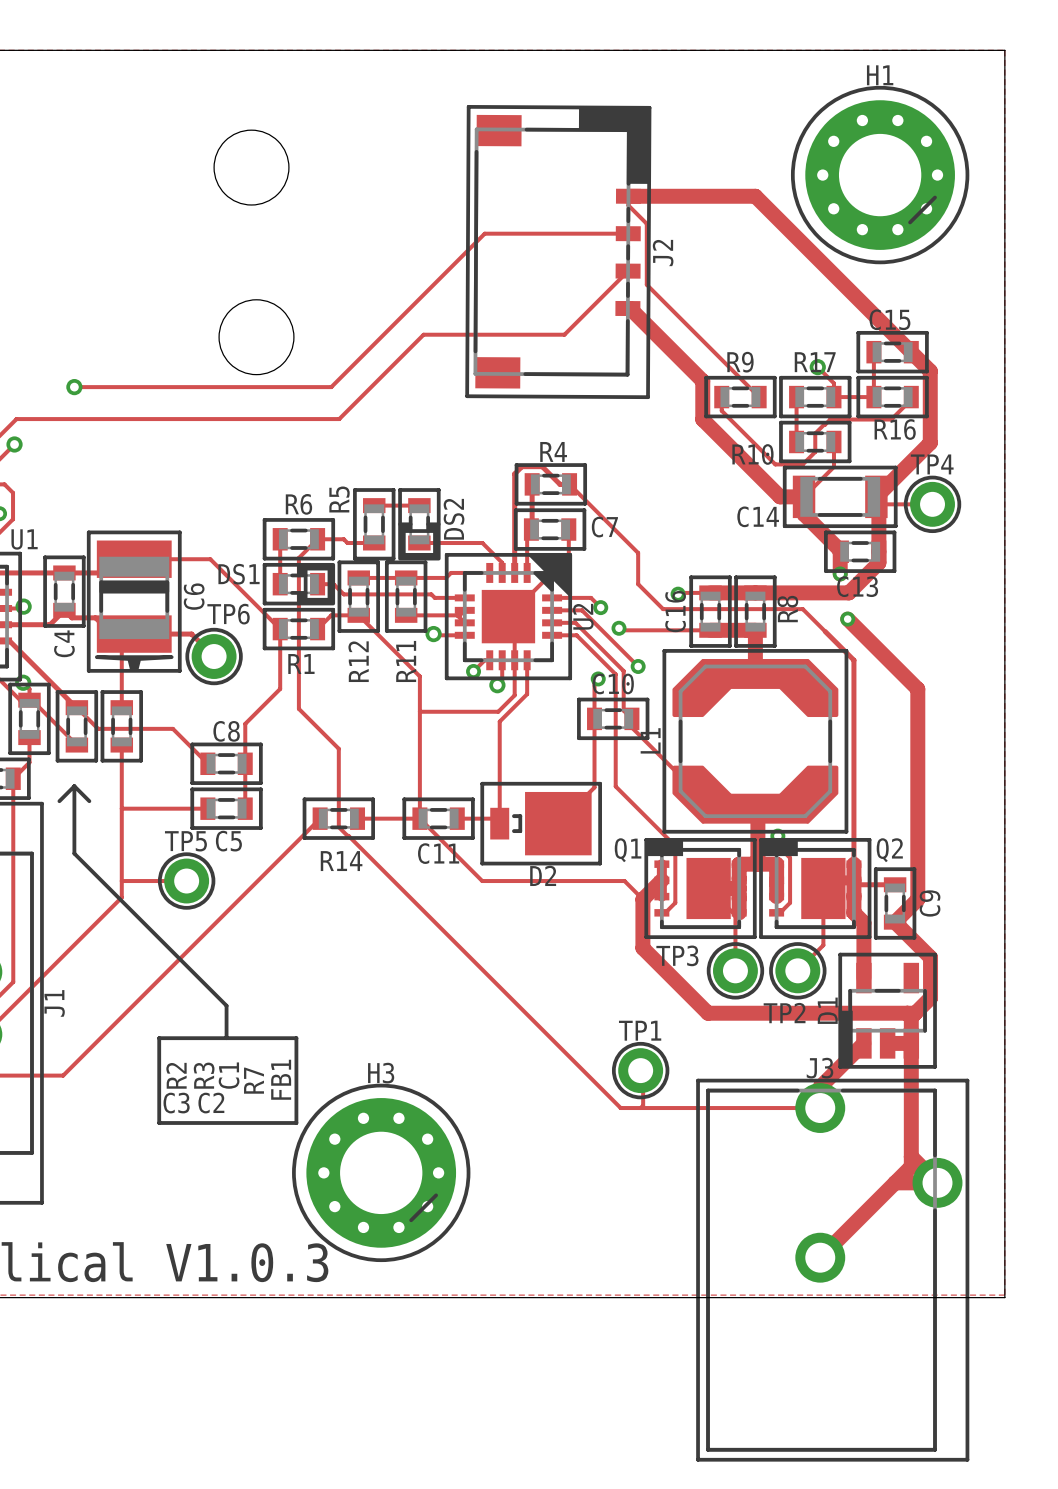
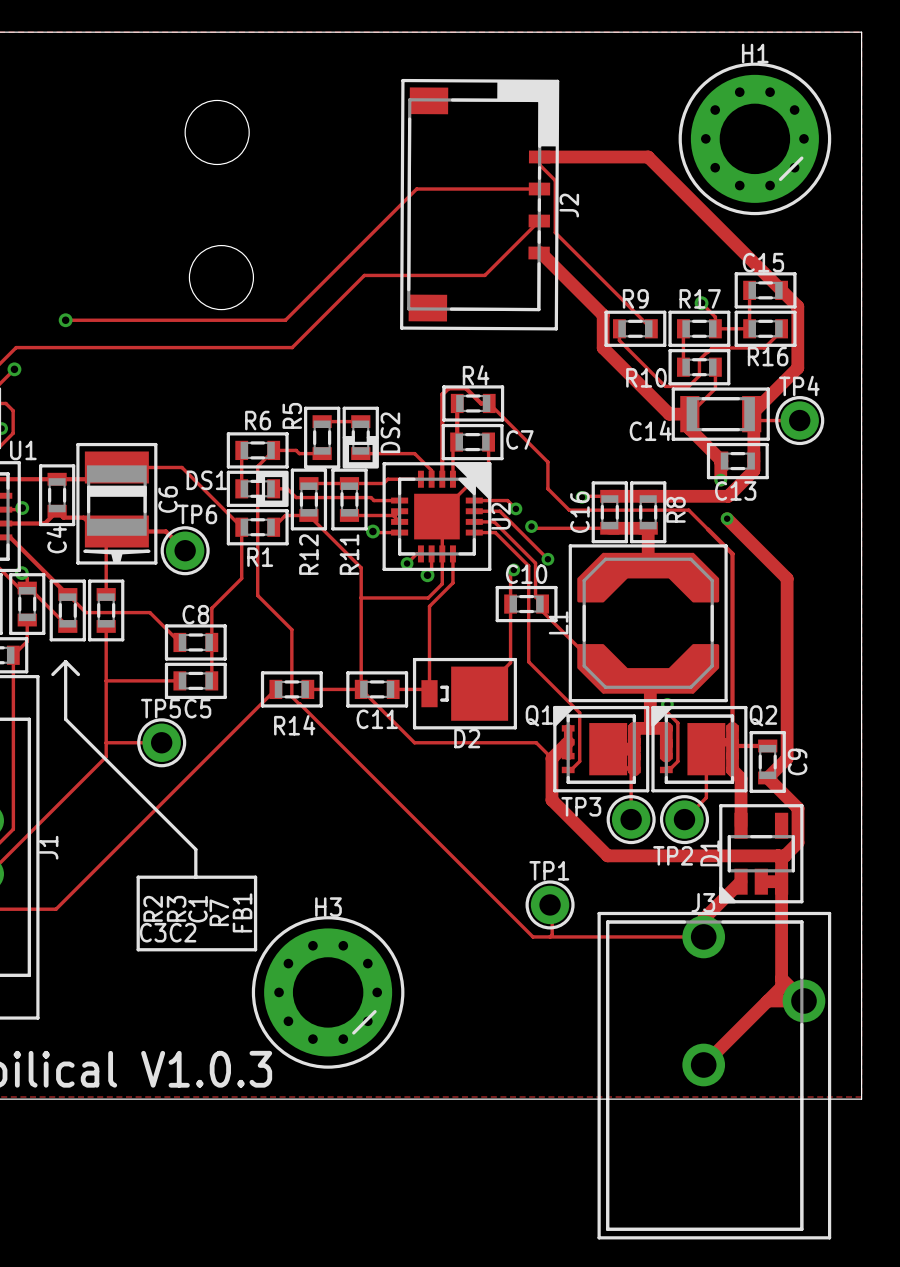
Q1 footprint: [644, 837, 757, 940] -> [553, 705, 650, 793]
Q2 footprint: [759, 837, 872, 940] -> [651, 705, 748, 793]
D1 footprint: [838, 952, 937, 1069] -> [719, 804, 804, 904]

